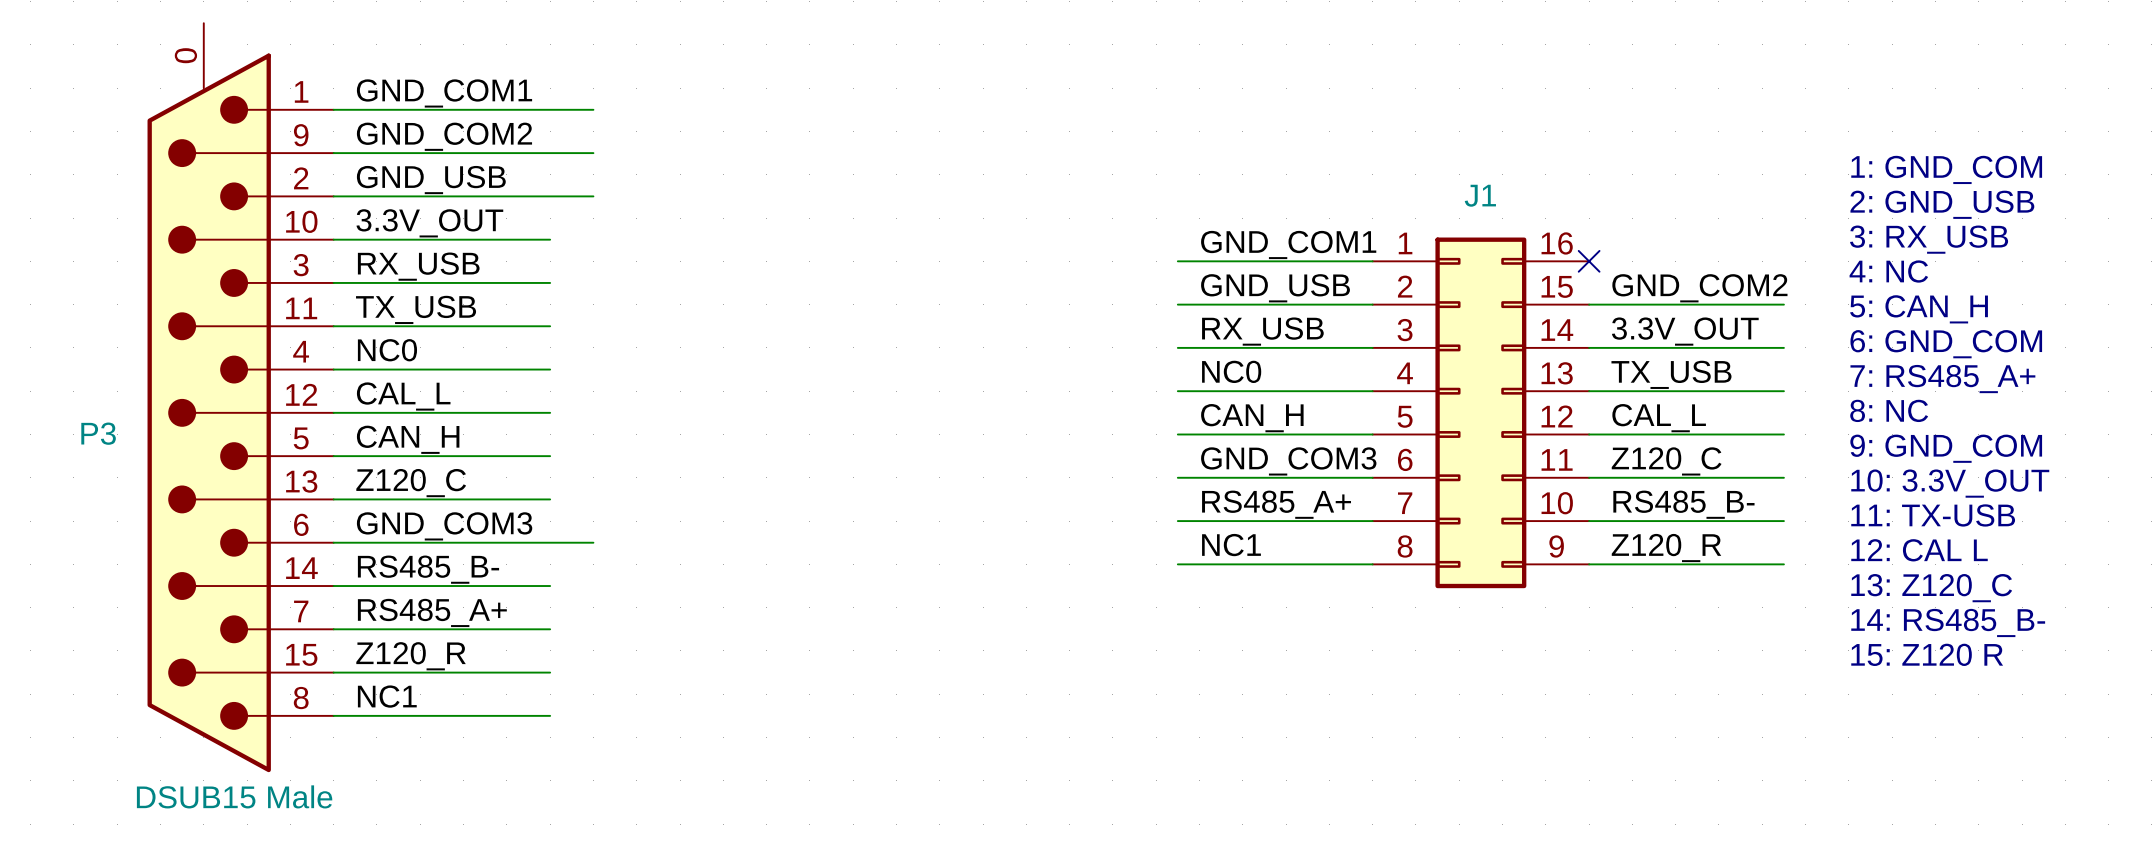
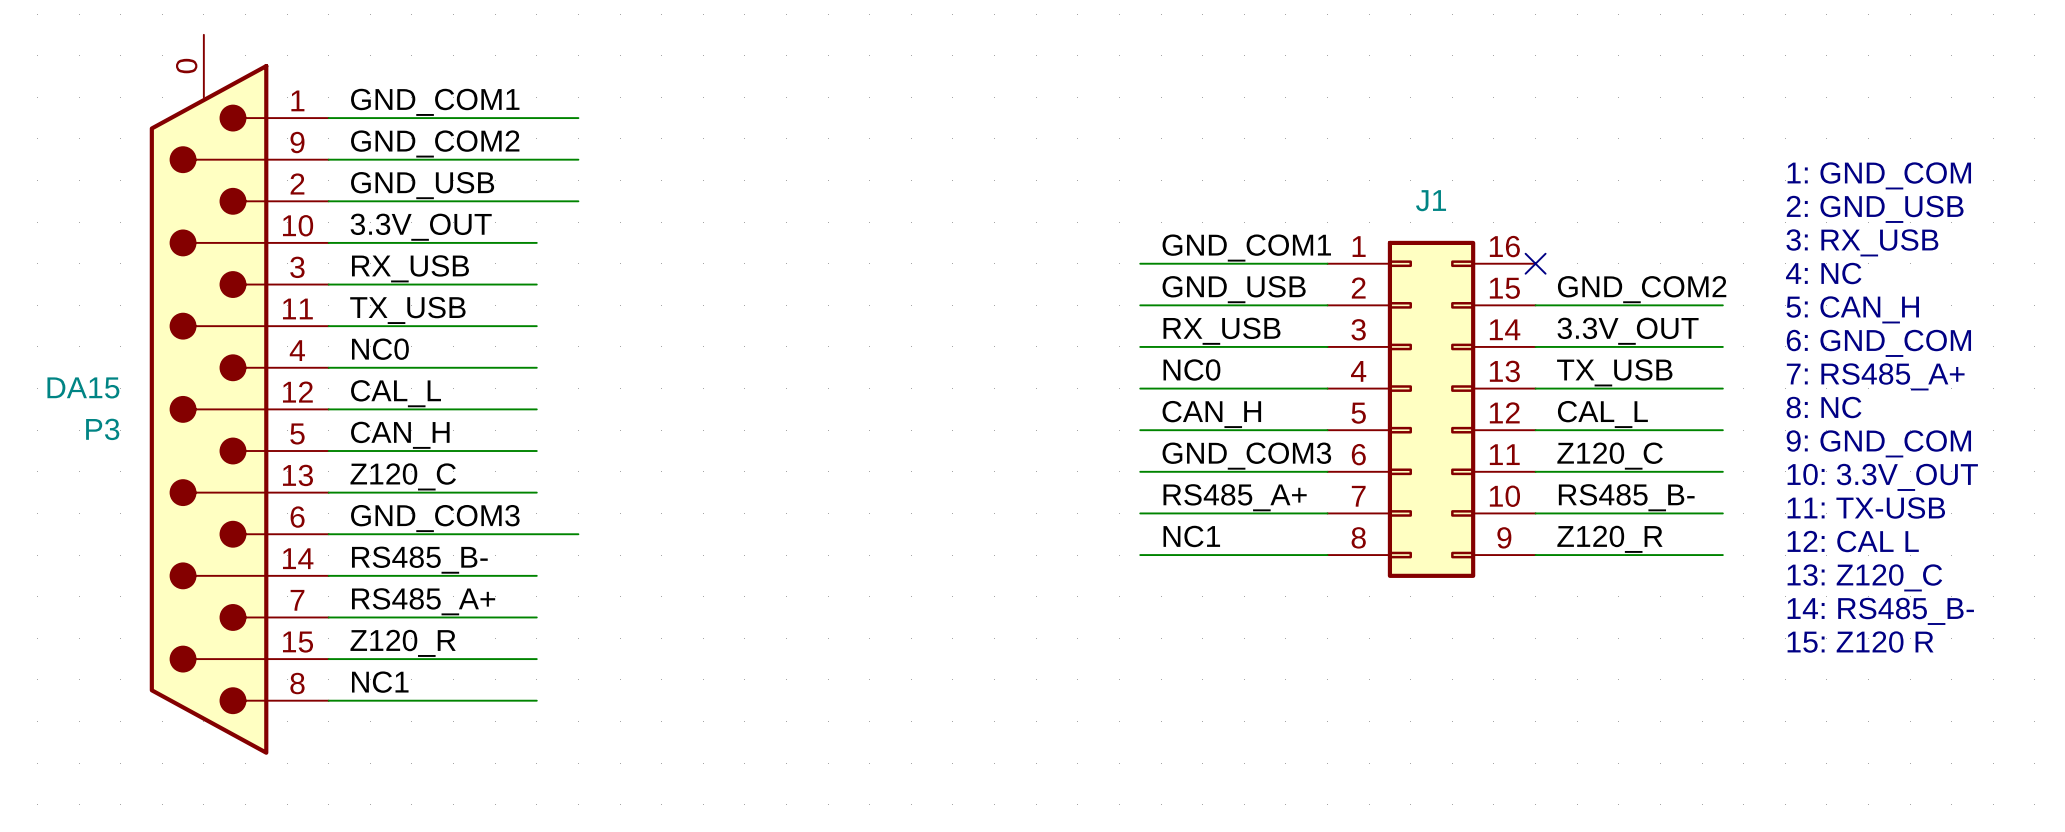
P3 value: DSUB15 Male (234, 796) -> DA15 (83, 387)

